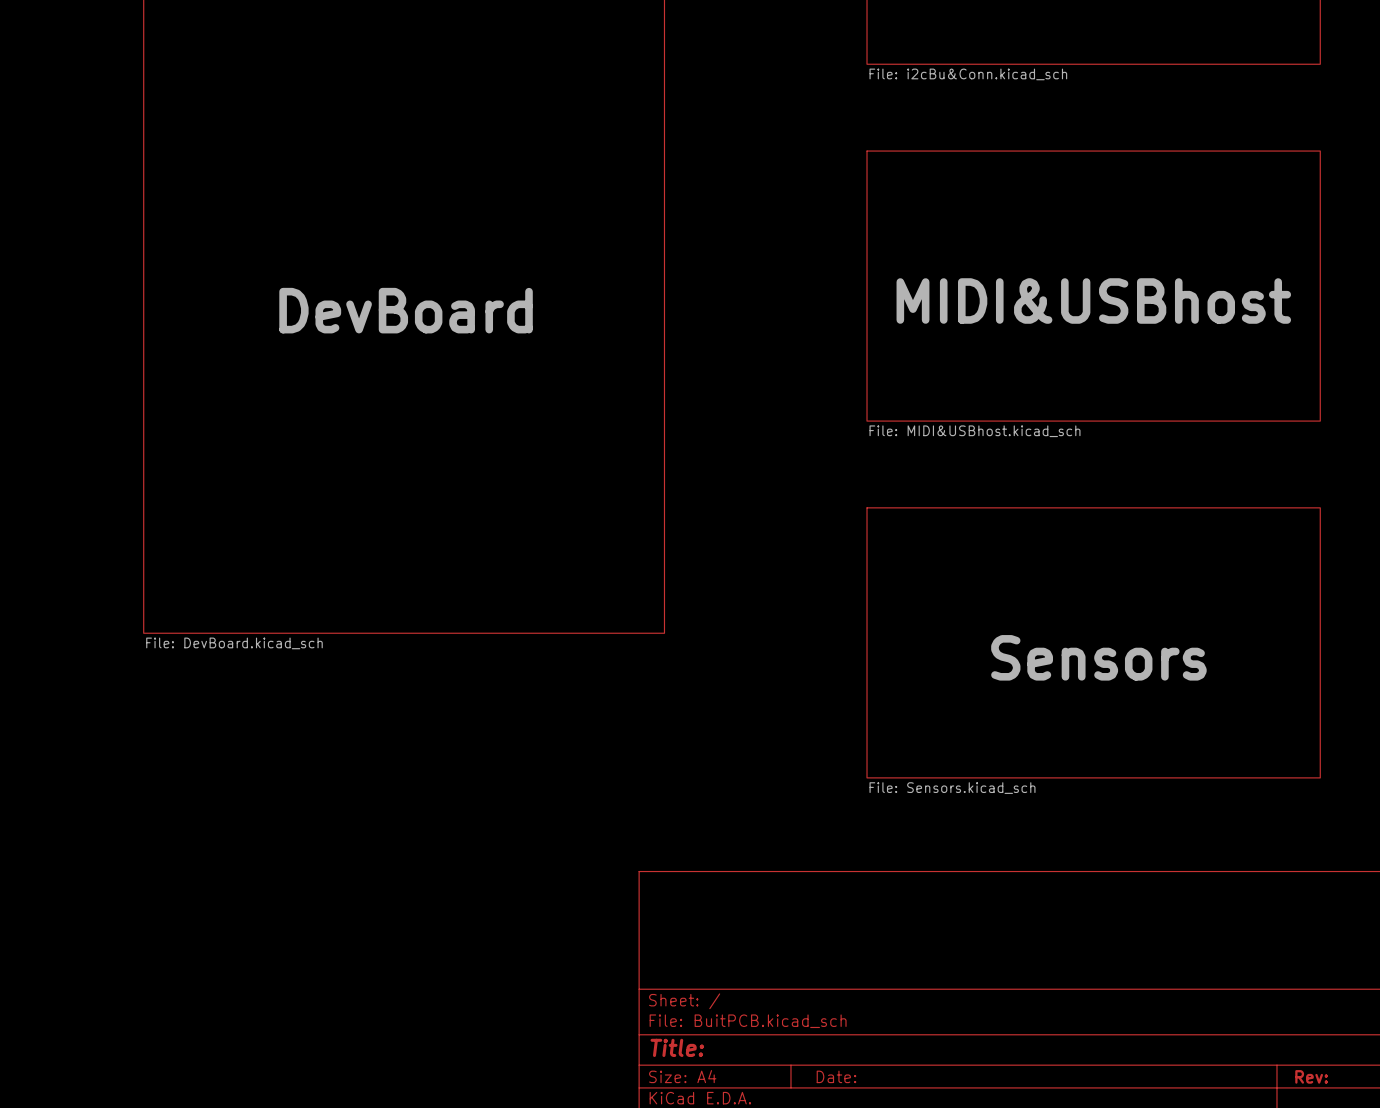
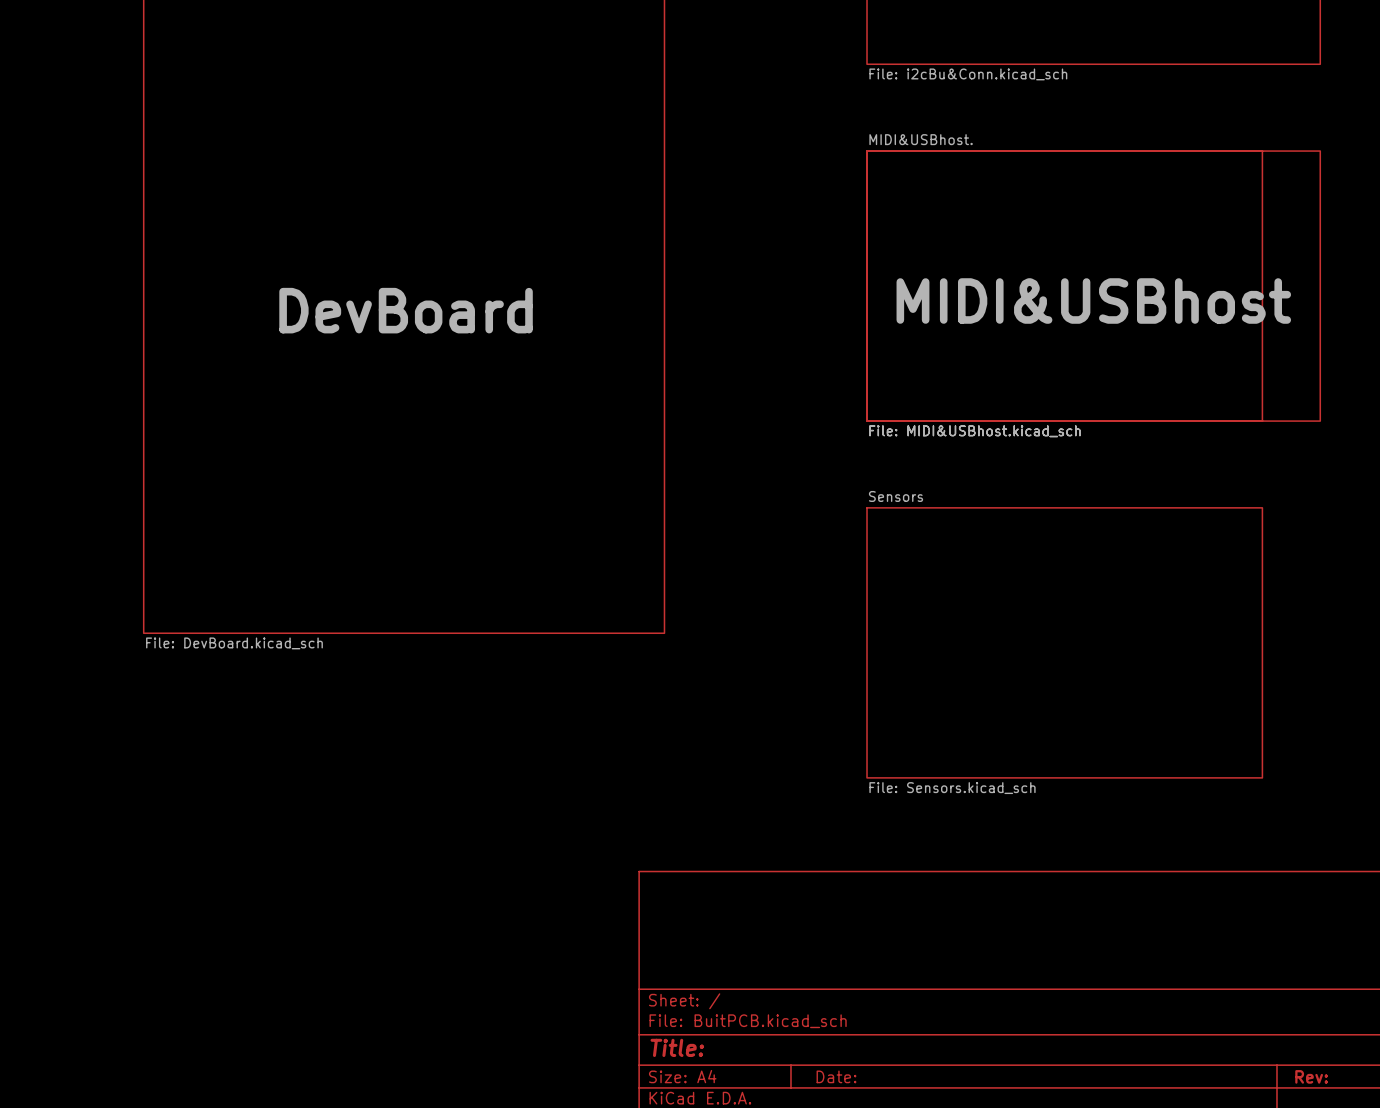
sheet MIDI&USBhost.: none -> File: MIDI&USBhost.kicad_sch (1064, 286)
sheet Sensors: none -> File: Sensors.kicad_sch (1064, 642)
sheet Sensors: File: Sensors.kicad_sch (1093, 642) -> none

